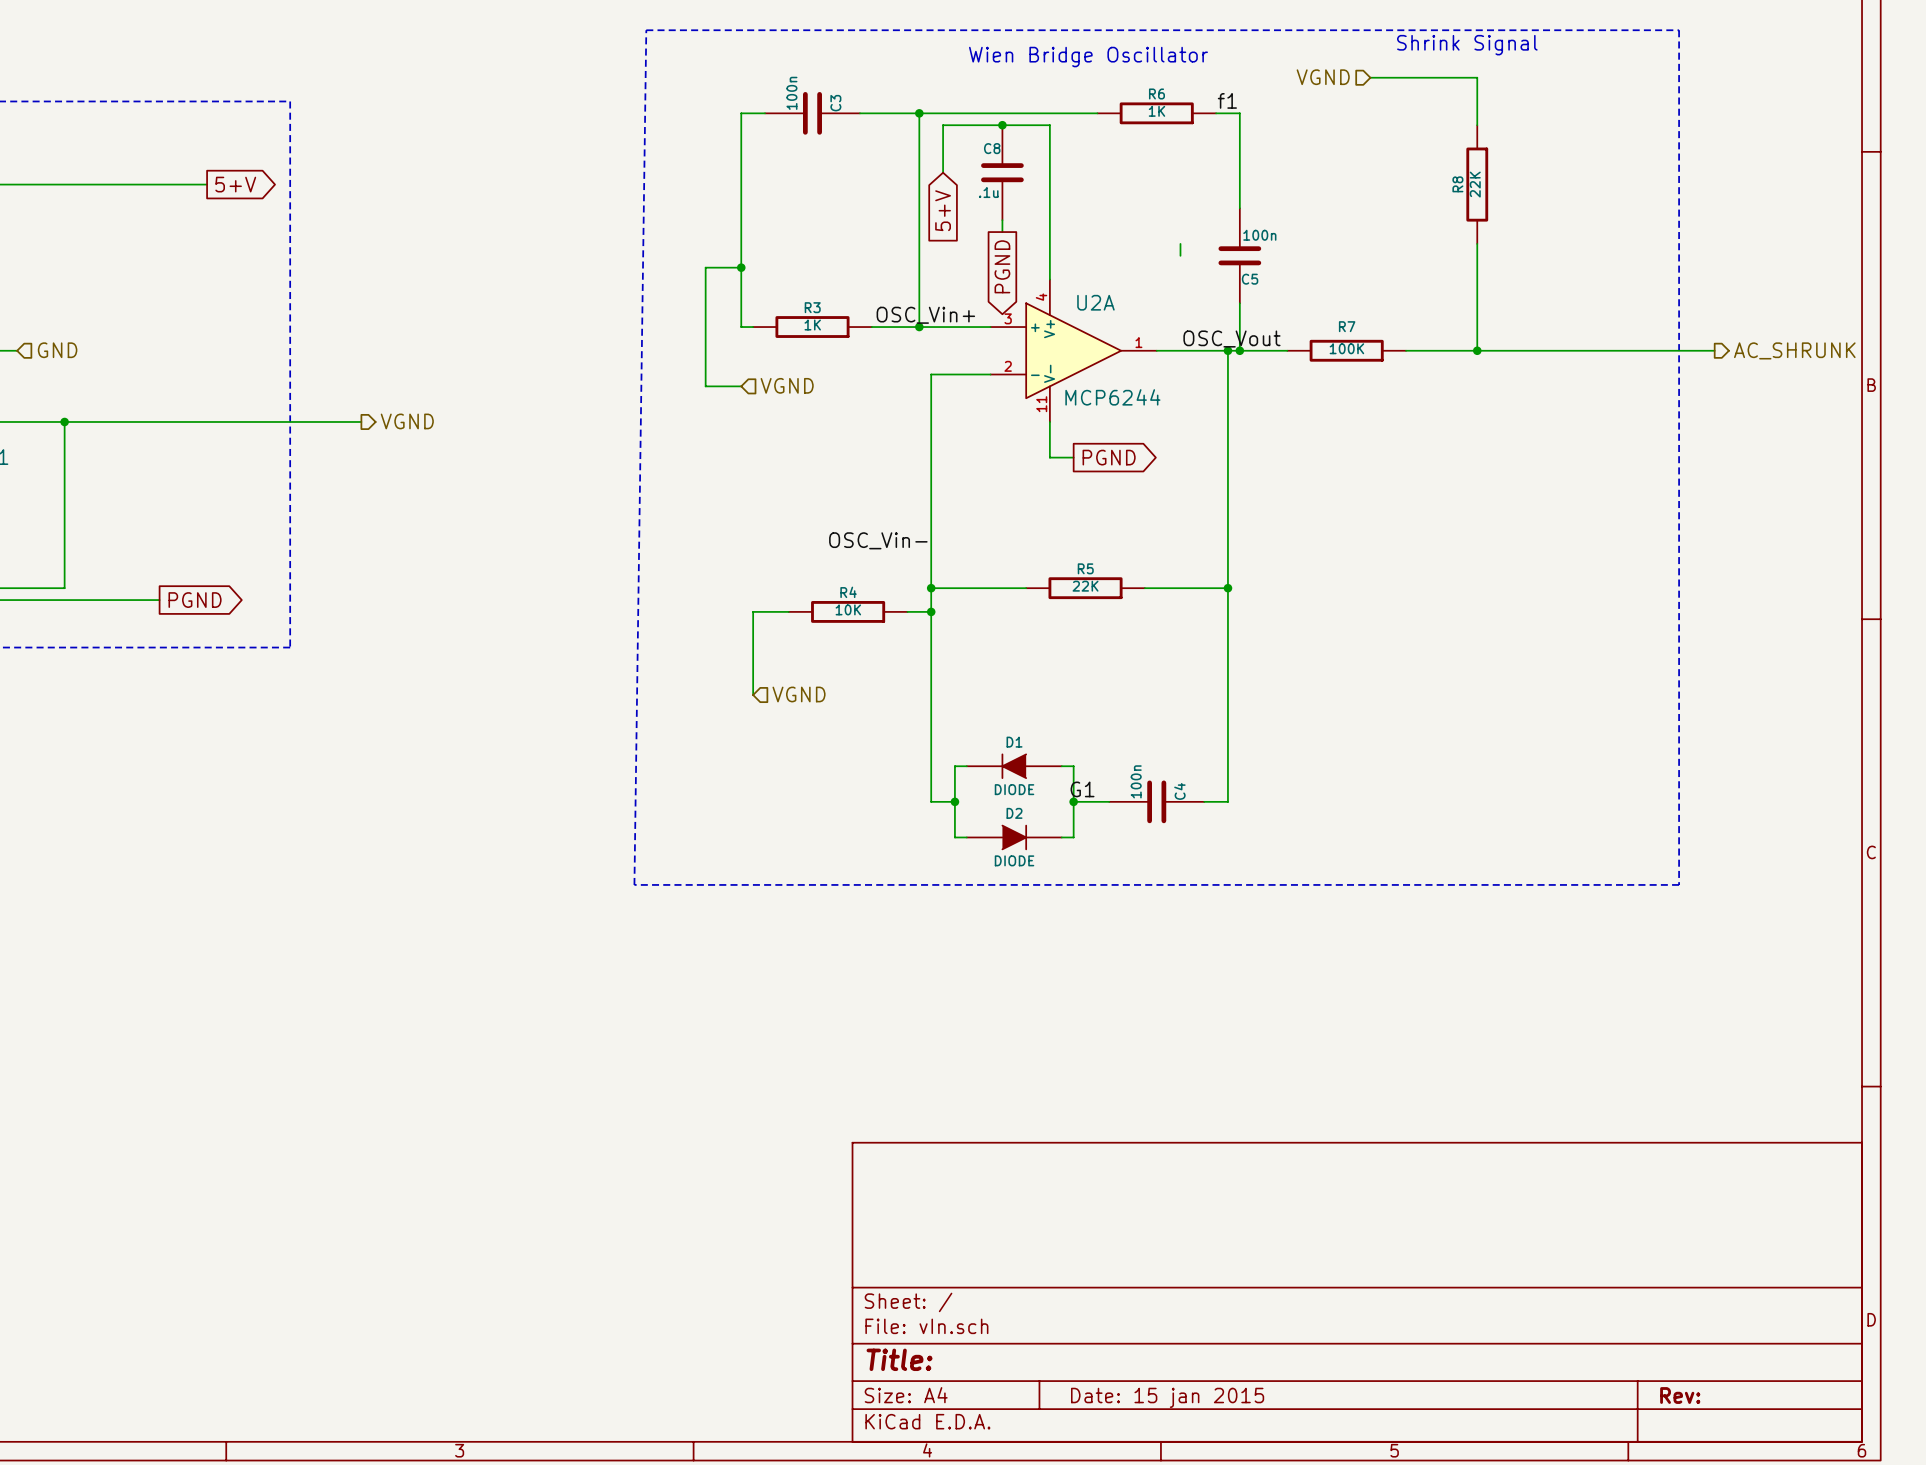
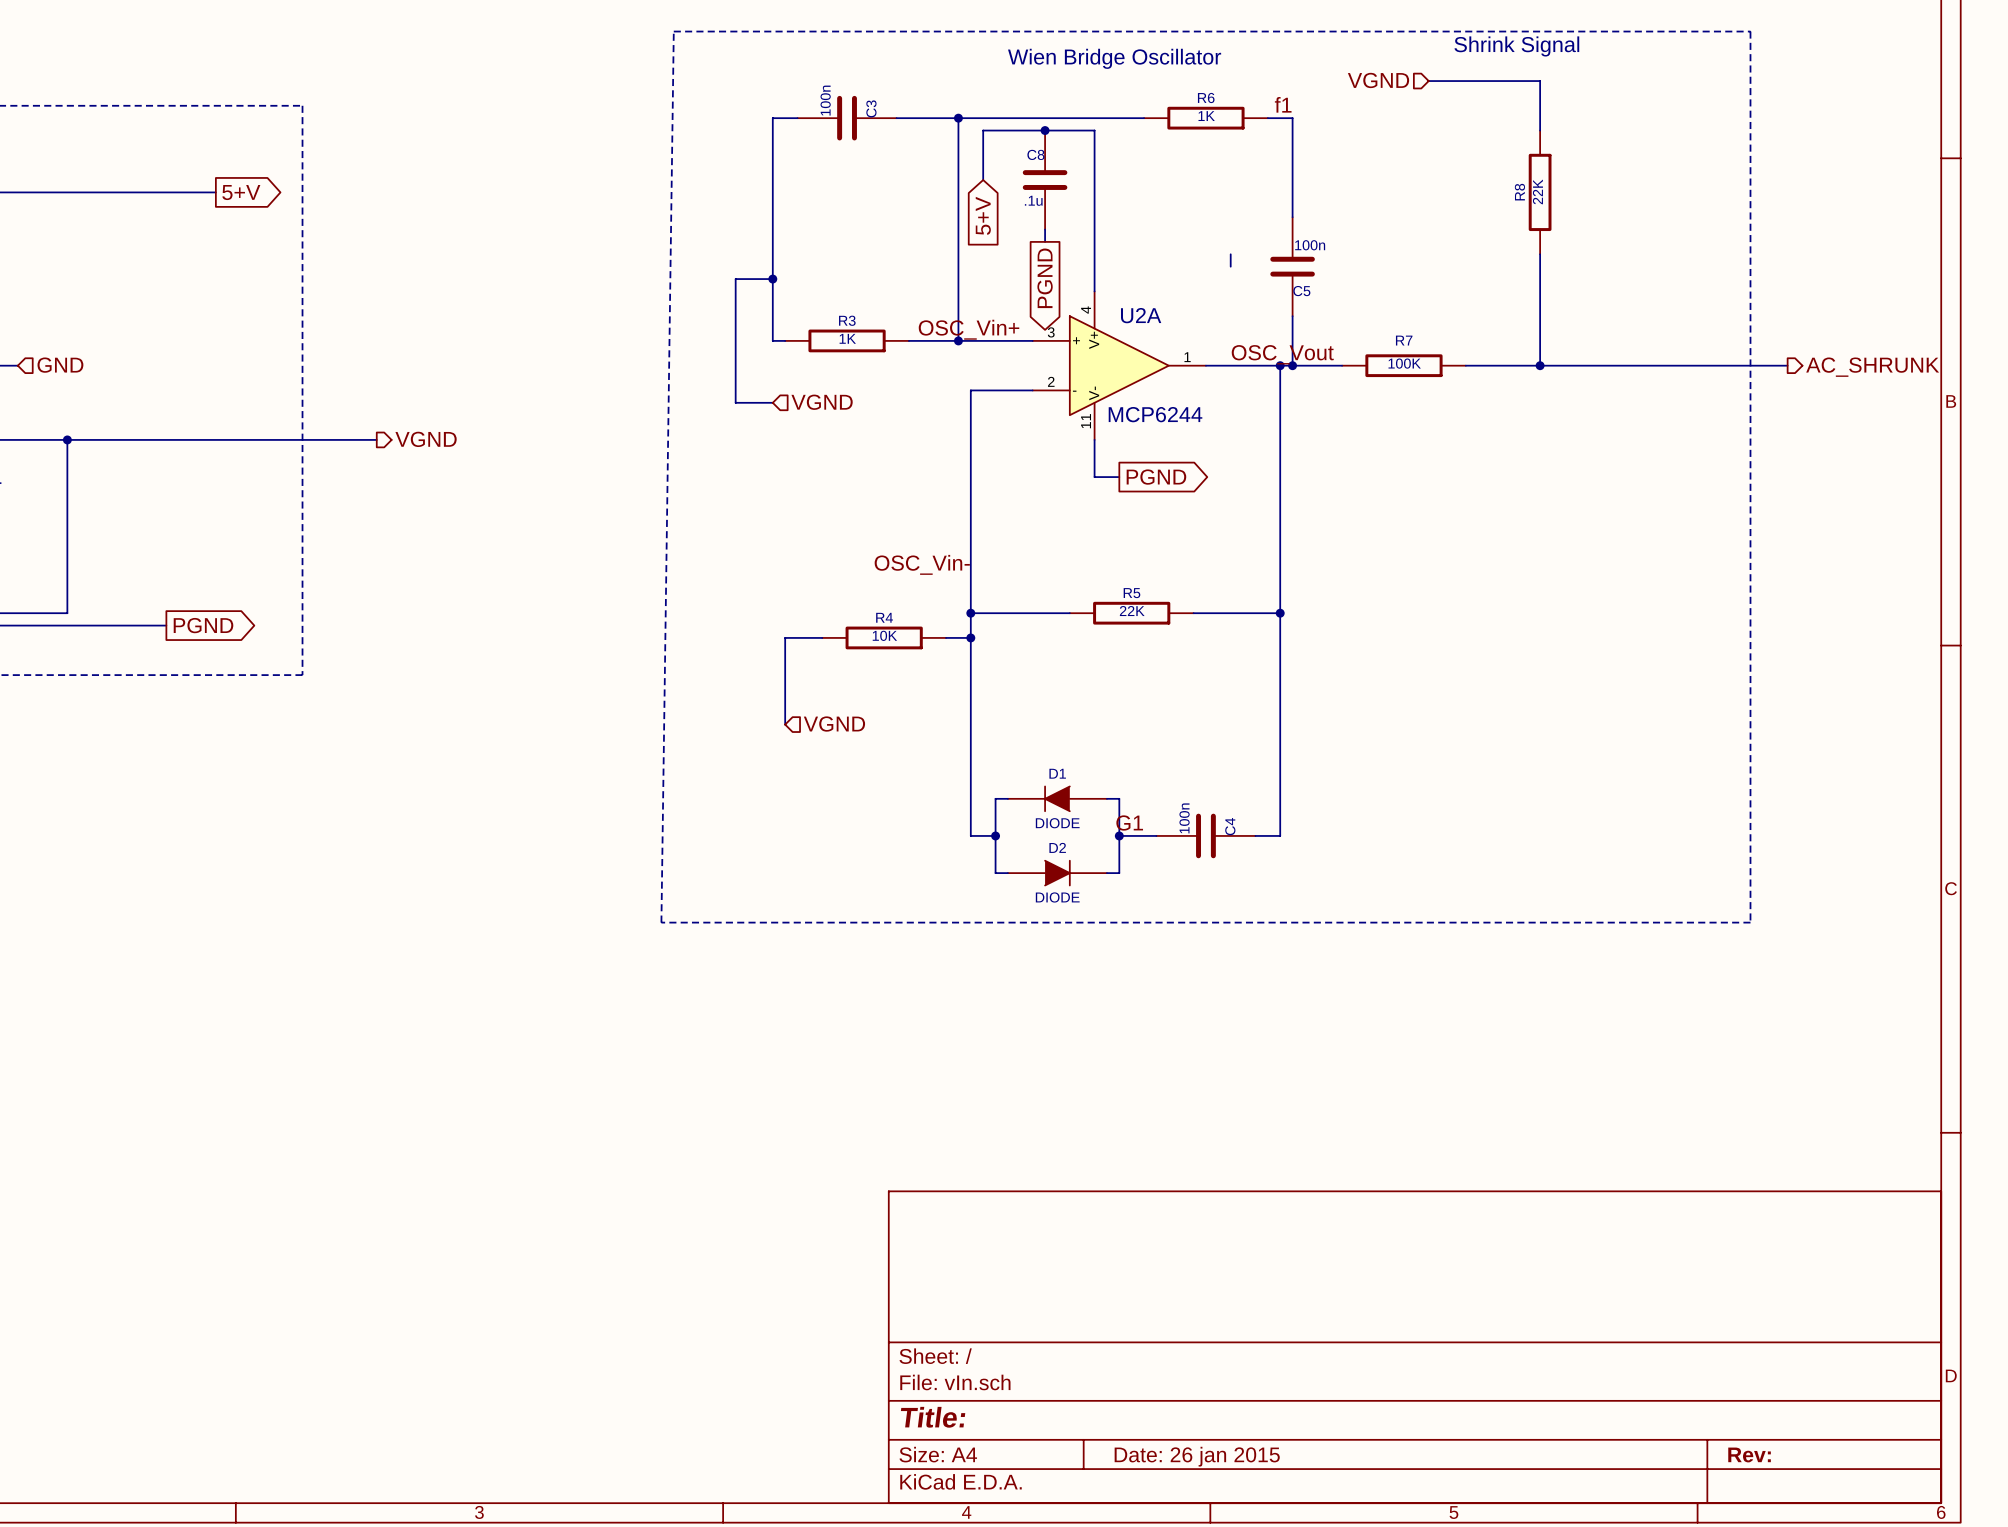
title block: Date: 15 jan 2015 (1167, 1397) -> Date: 26 jan 2015 (1197, 1456)

